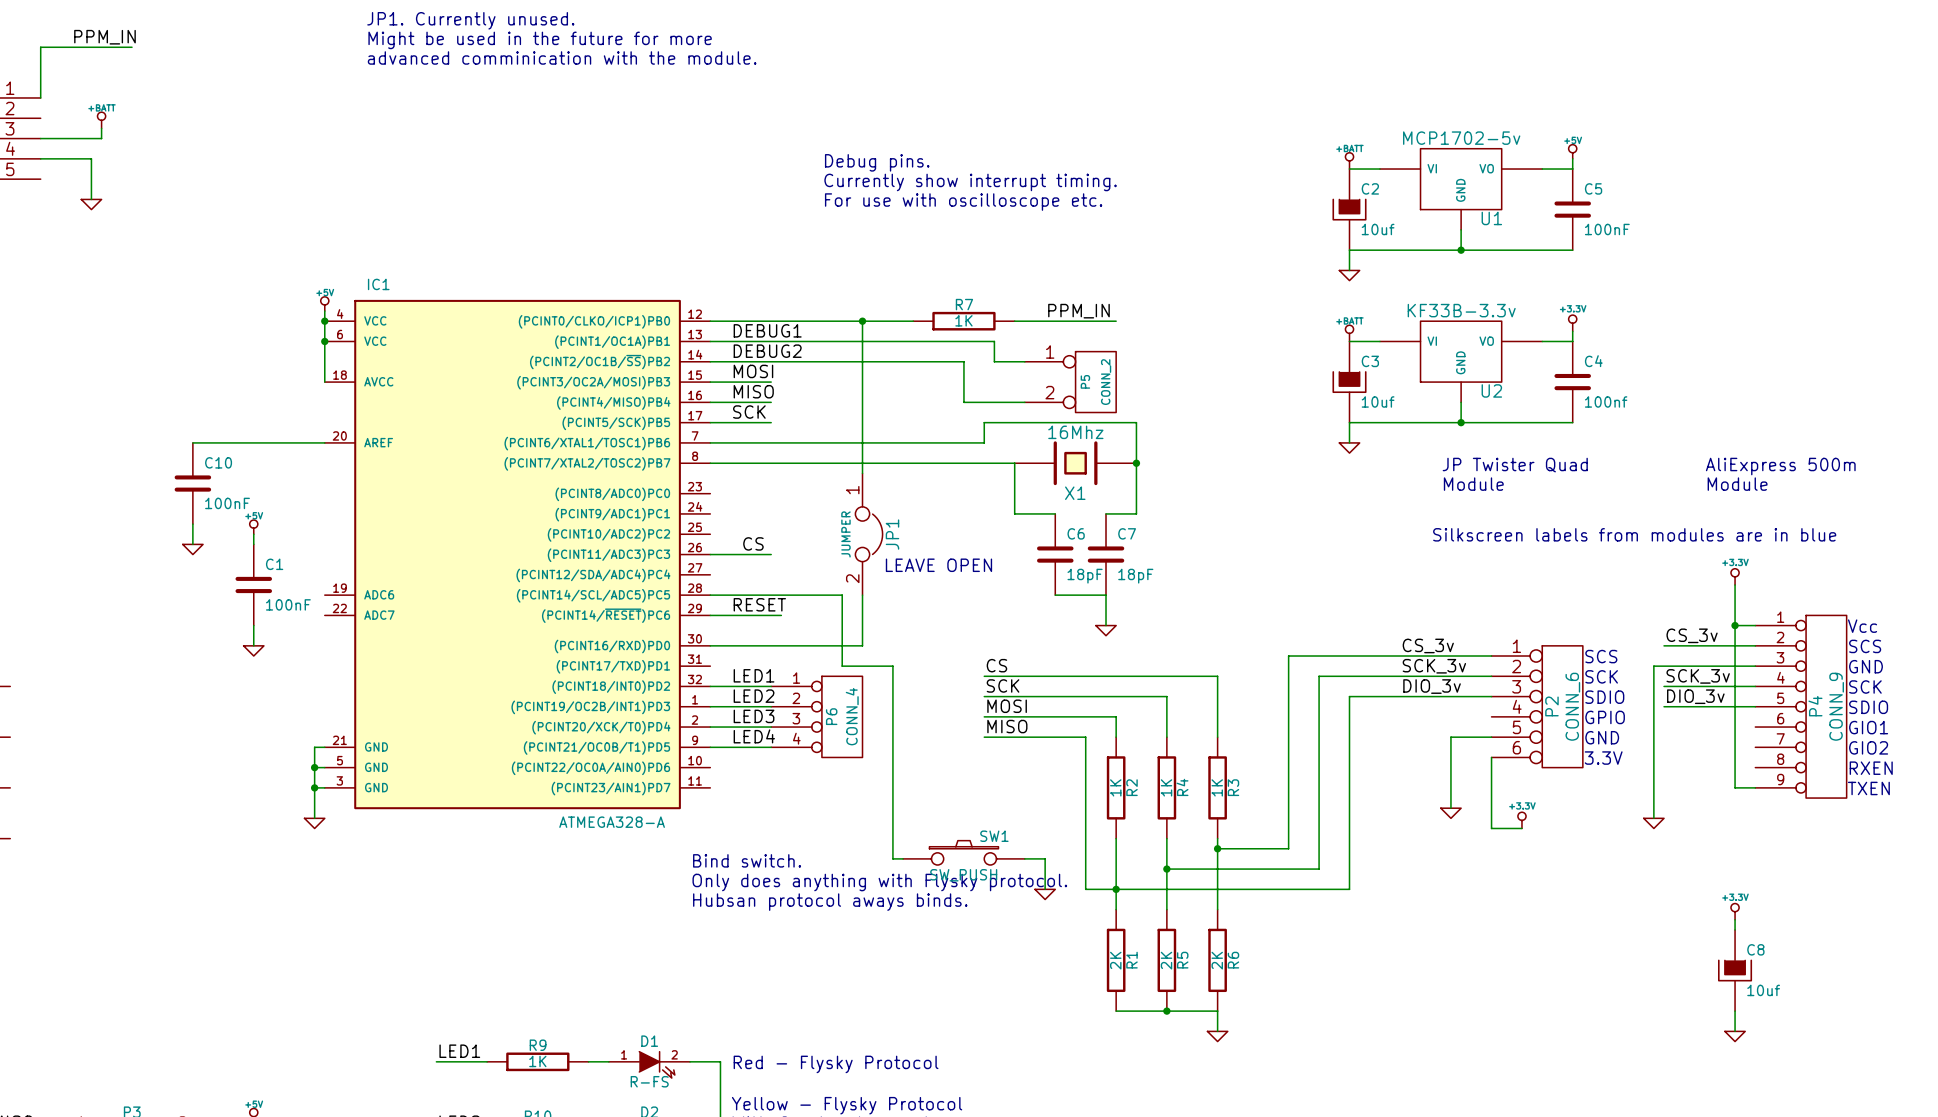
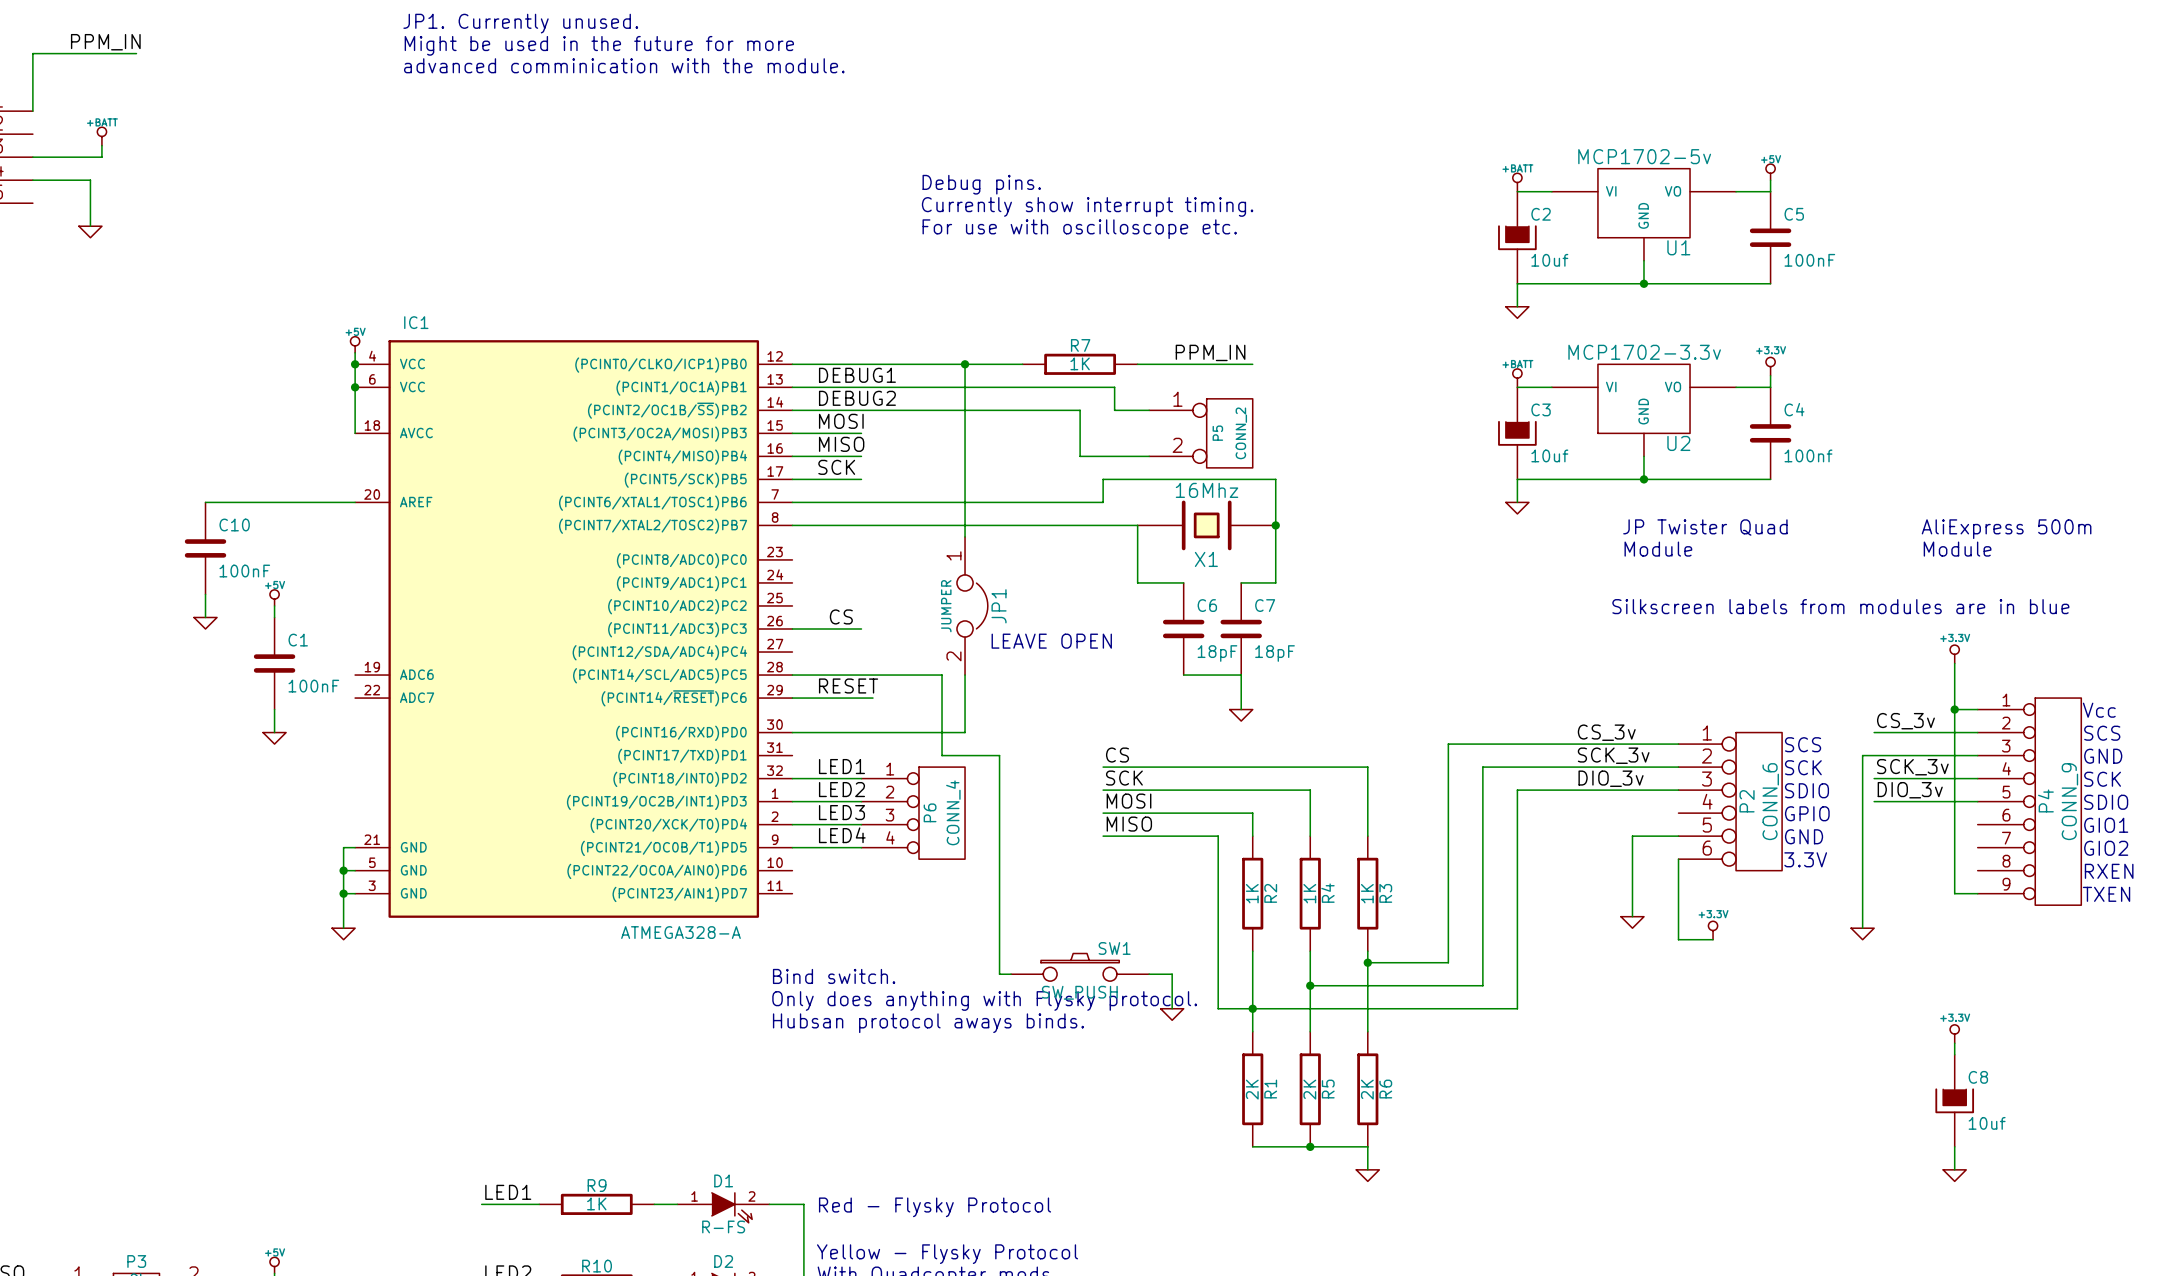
U2 value: KF33B-3.3v (1461, 310) -> MCP1702-3.3v (1644, 352)

